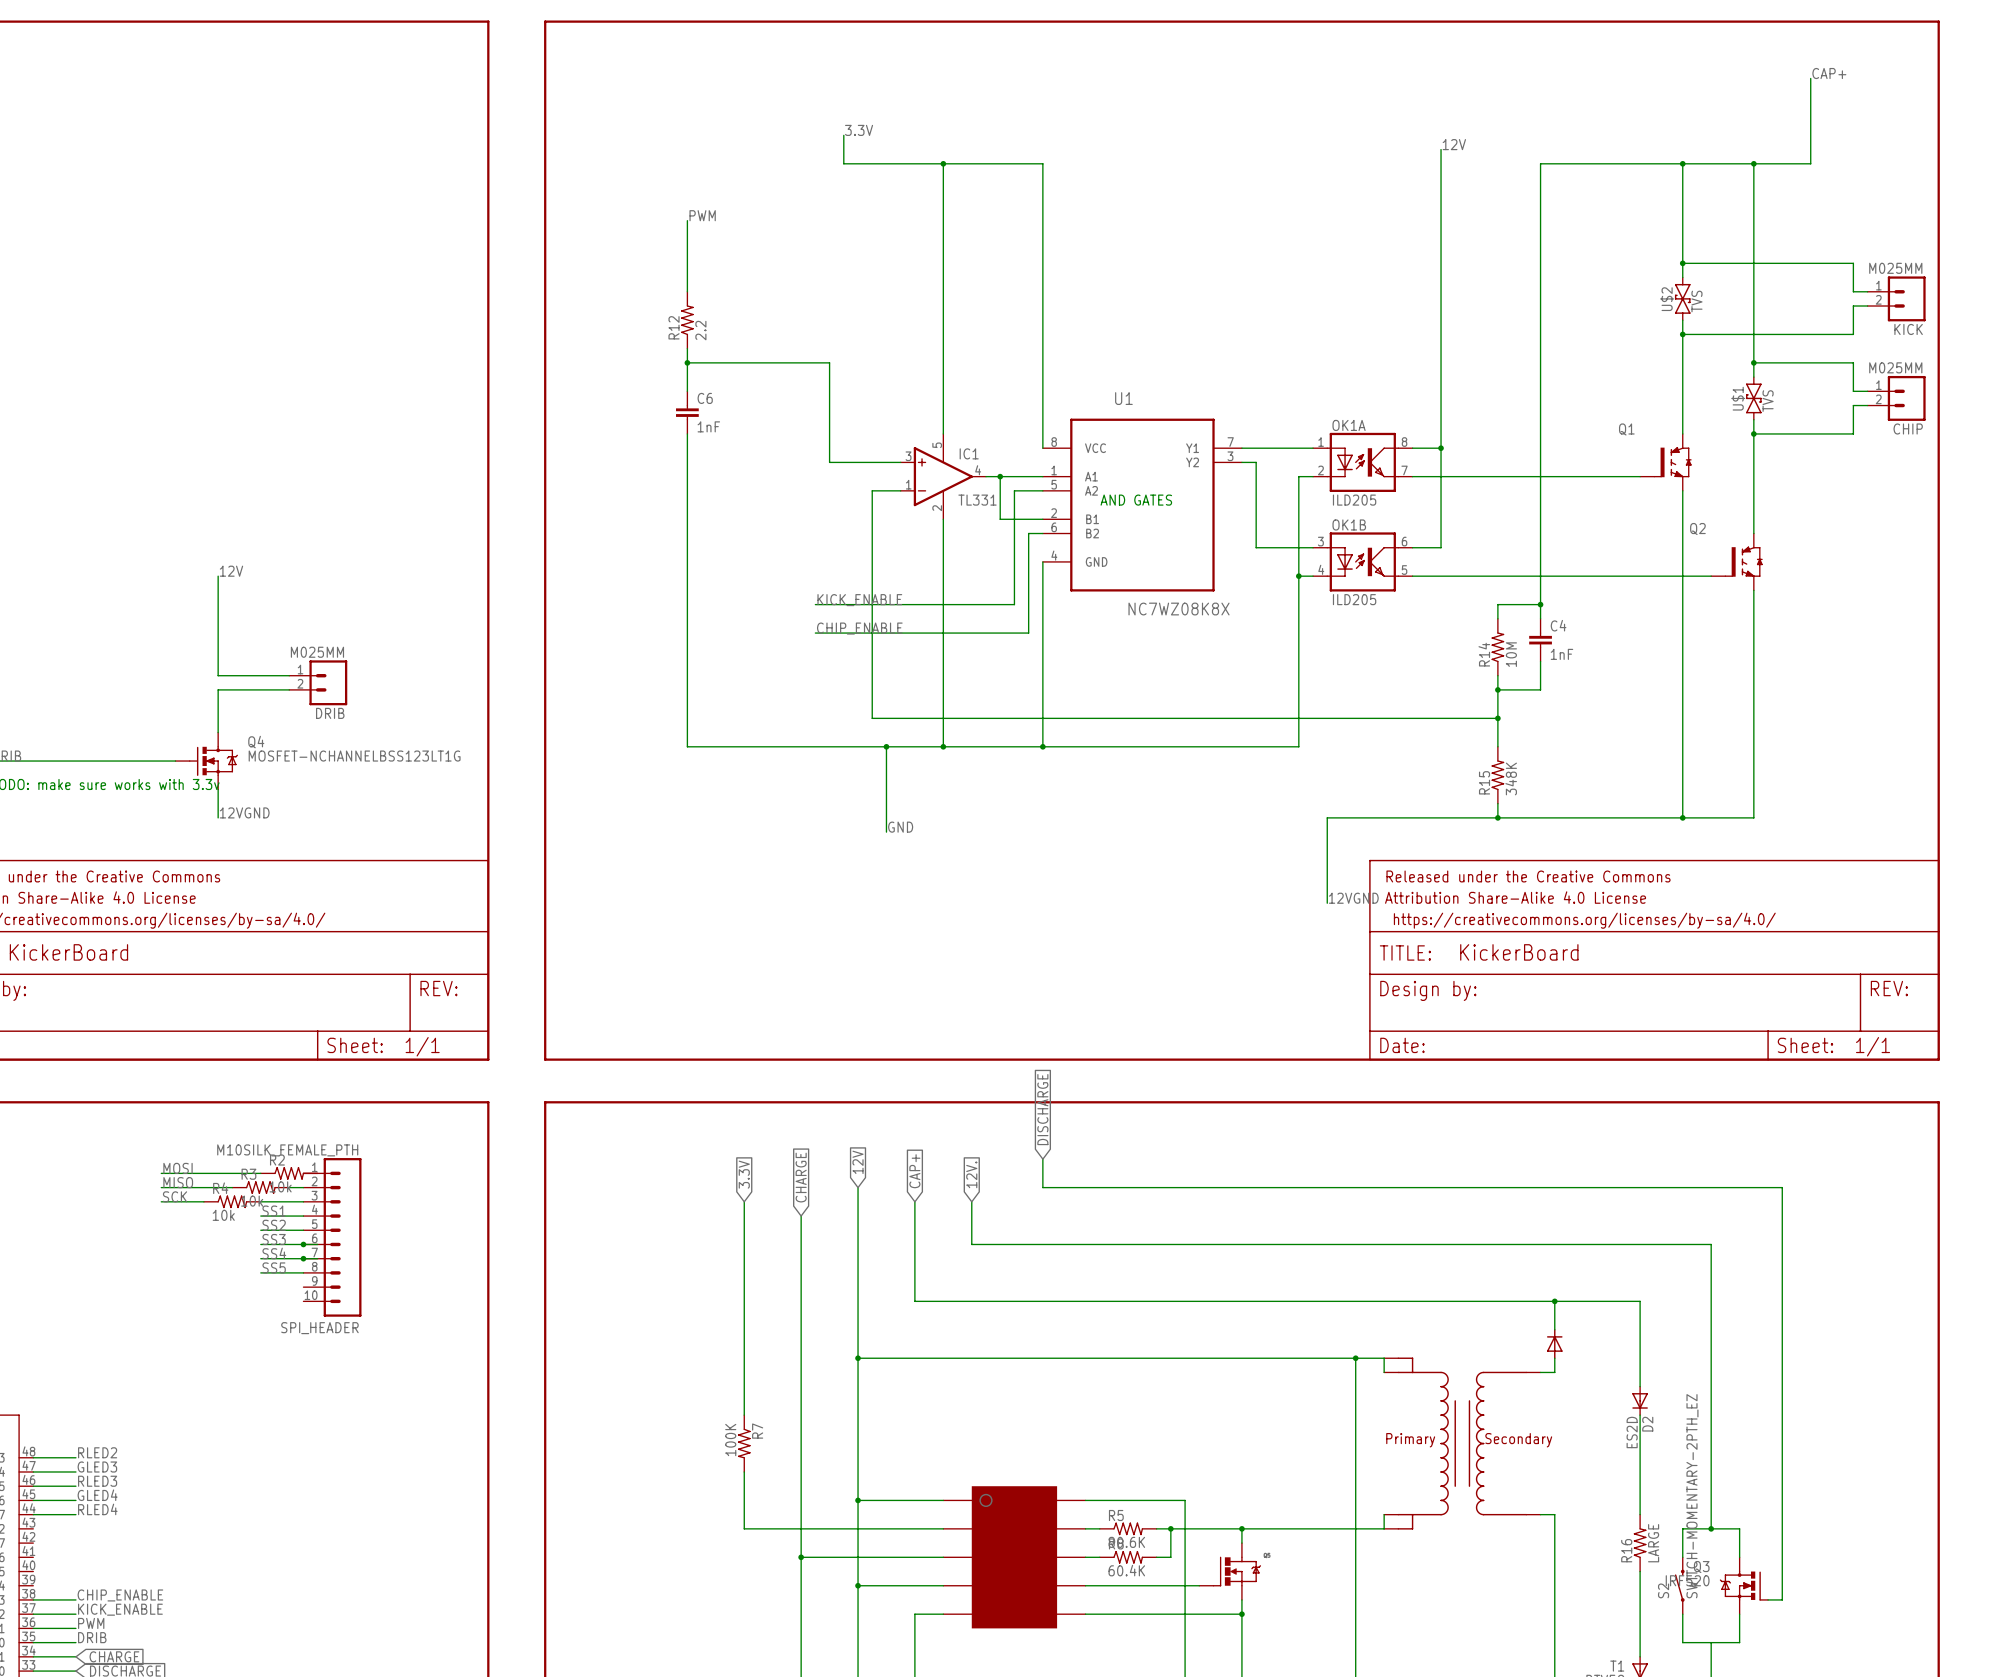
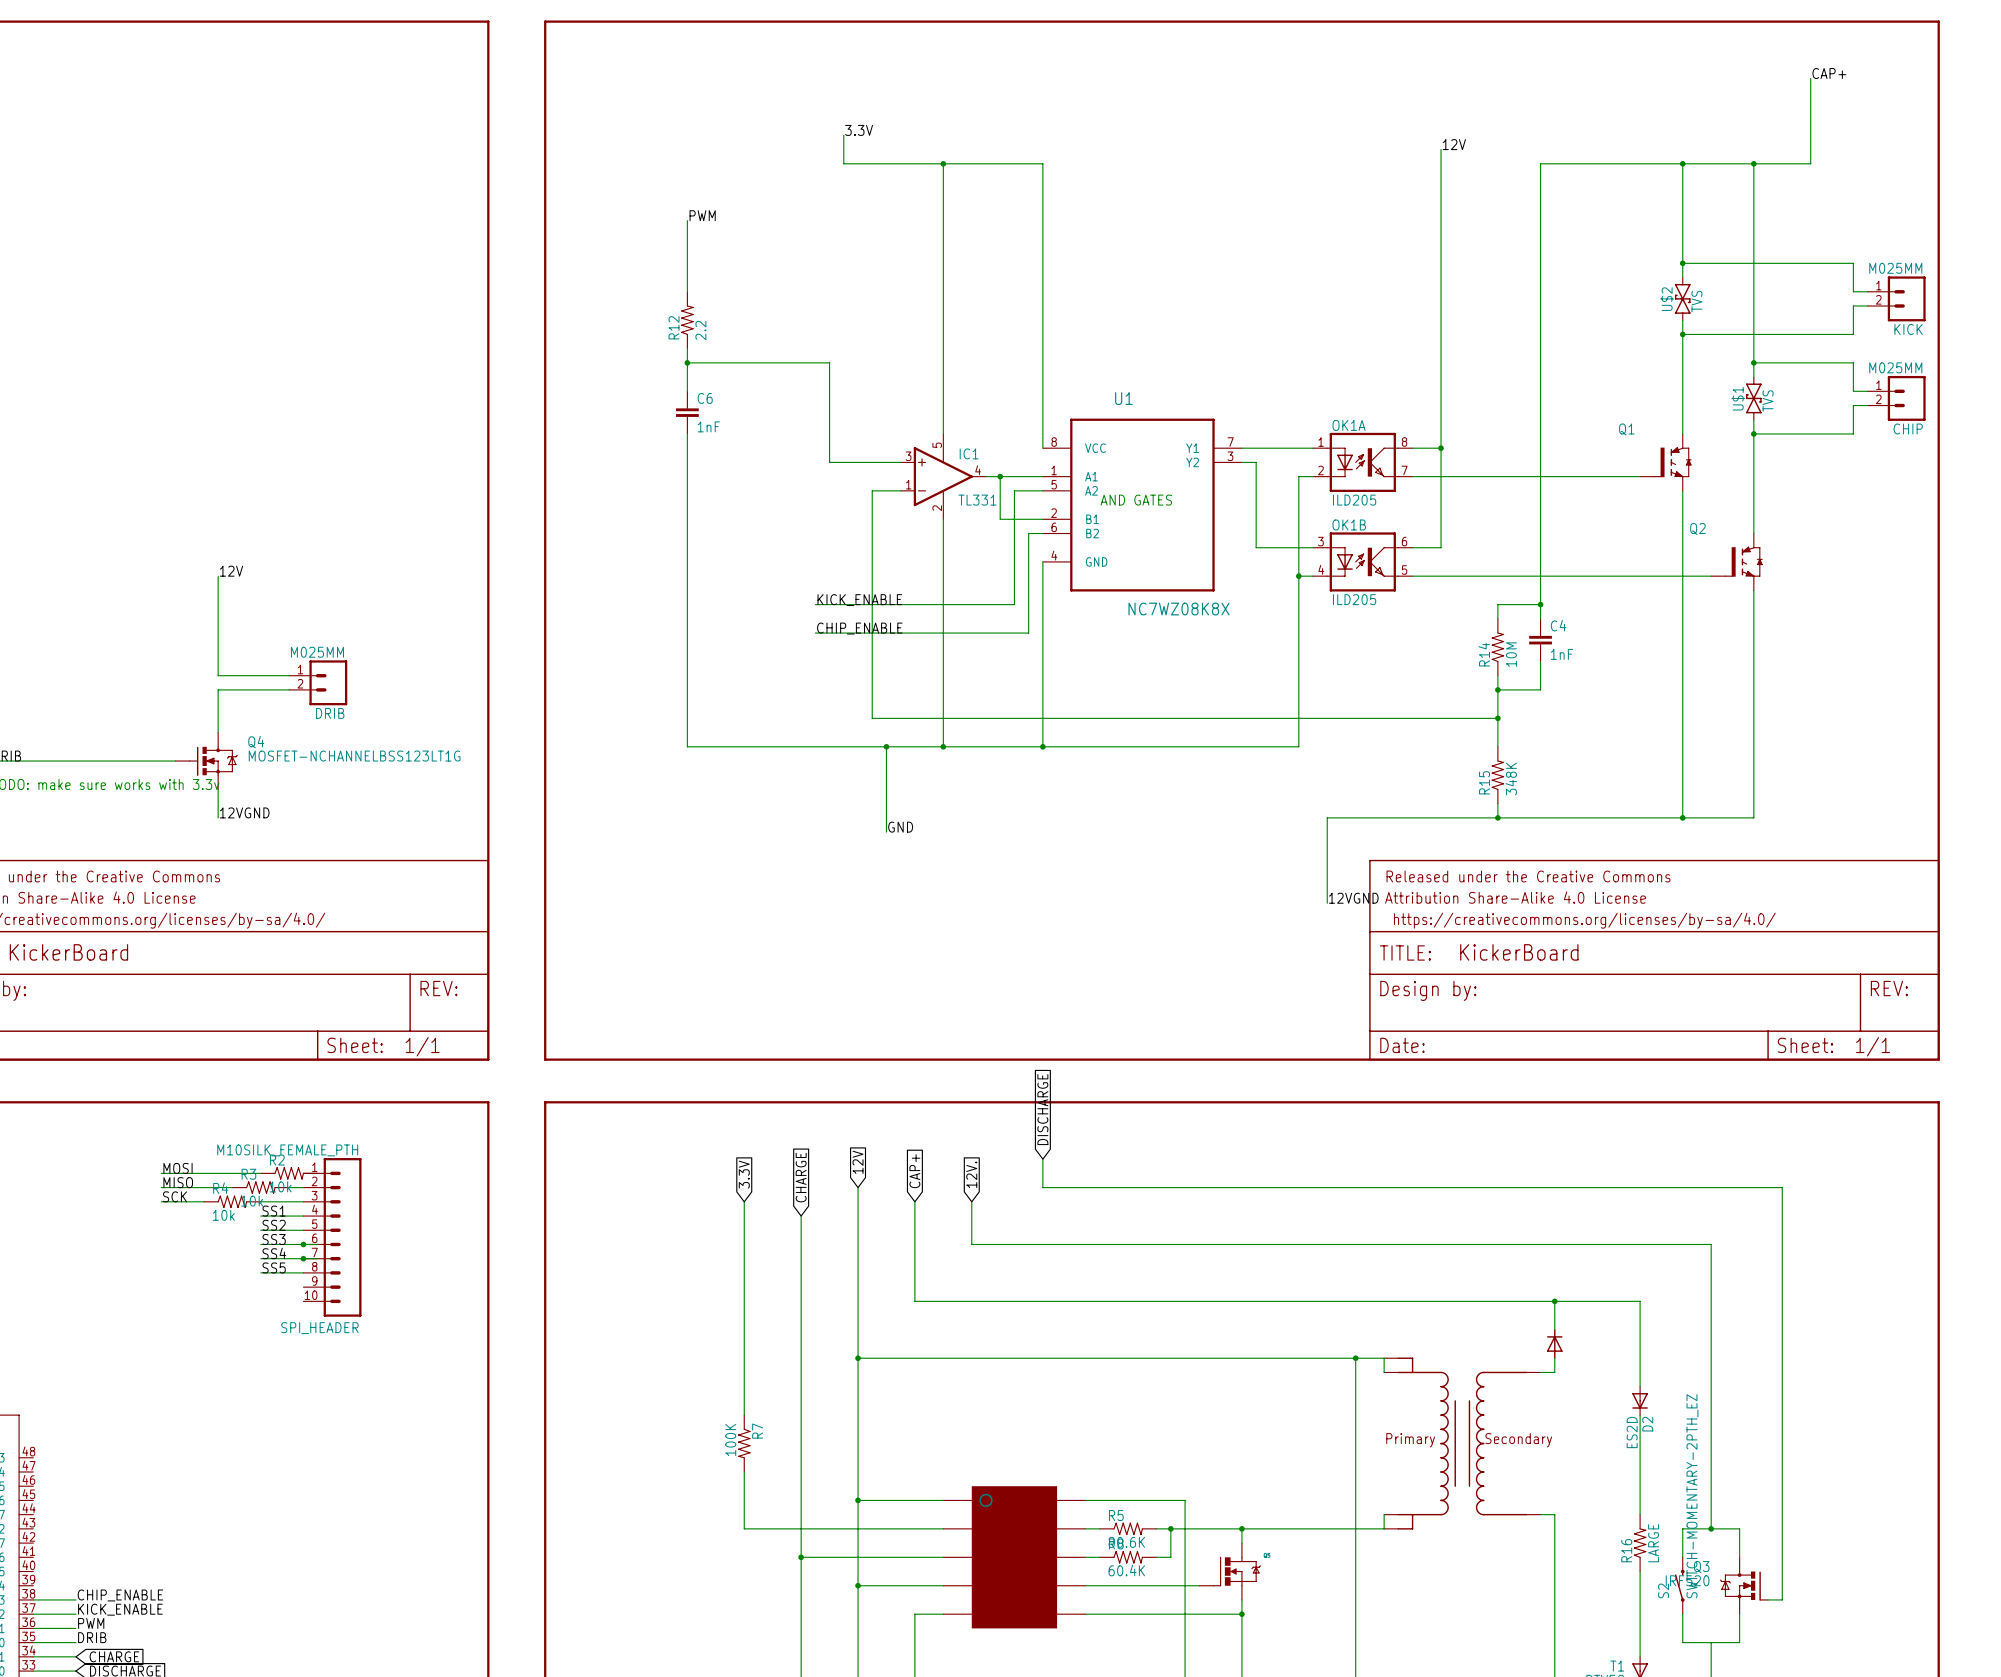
label: RLED2 (97, 1452) -> none
wire: (33, 1457) (75, 1457) -> none
label: GLED3 (97, 1467) -> none
wire: (33, 1471) (75, 1471) -> none
label: RLED3 (97, 1481) -> none
wire: (33, 1486) (75, 1486) -> none
label: GLED4 (97, 1495) -> none
wire: (33, 1500) (75, 1500) -> none
label: RLED4 (97, 1509) -> none
wire: (33, 1514) (75, 1514) -> none

